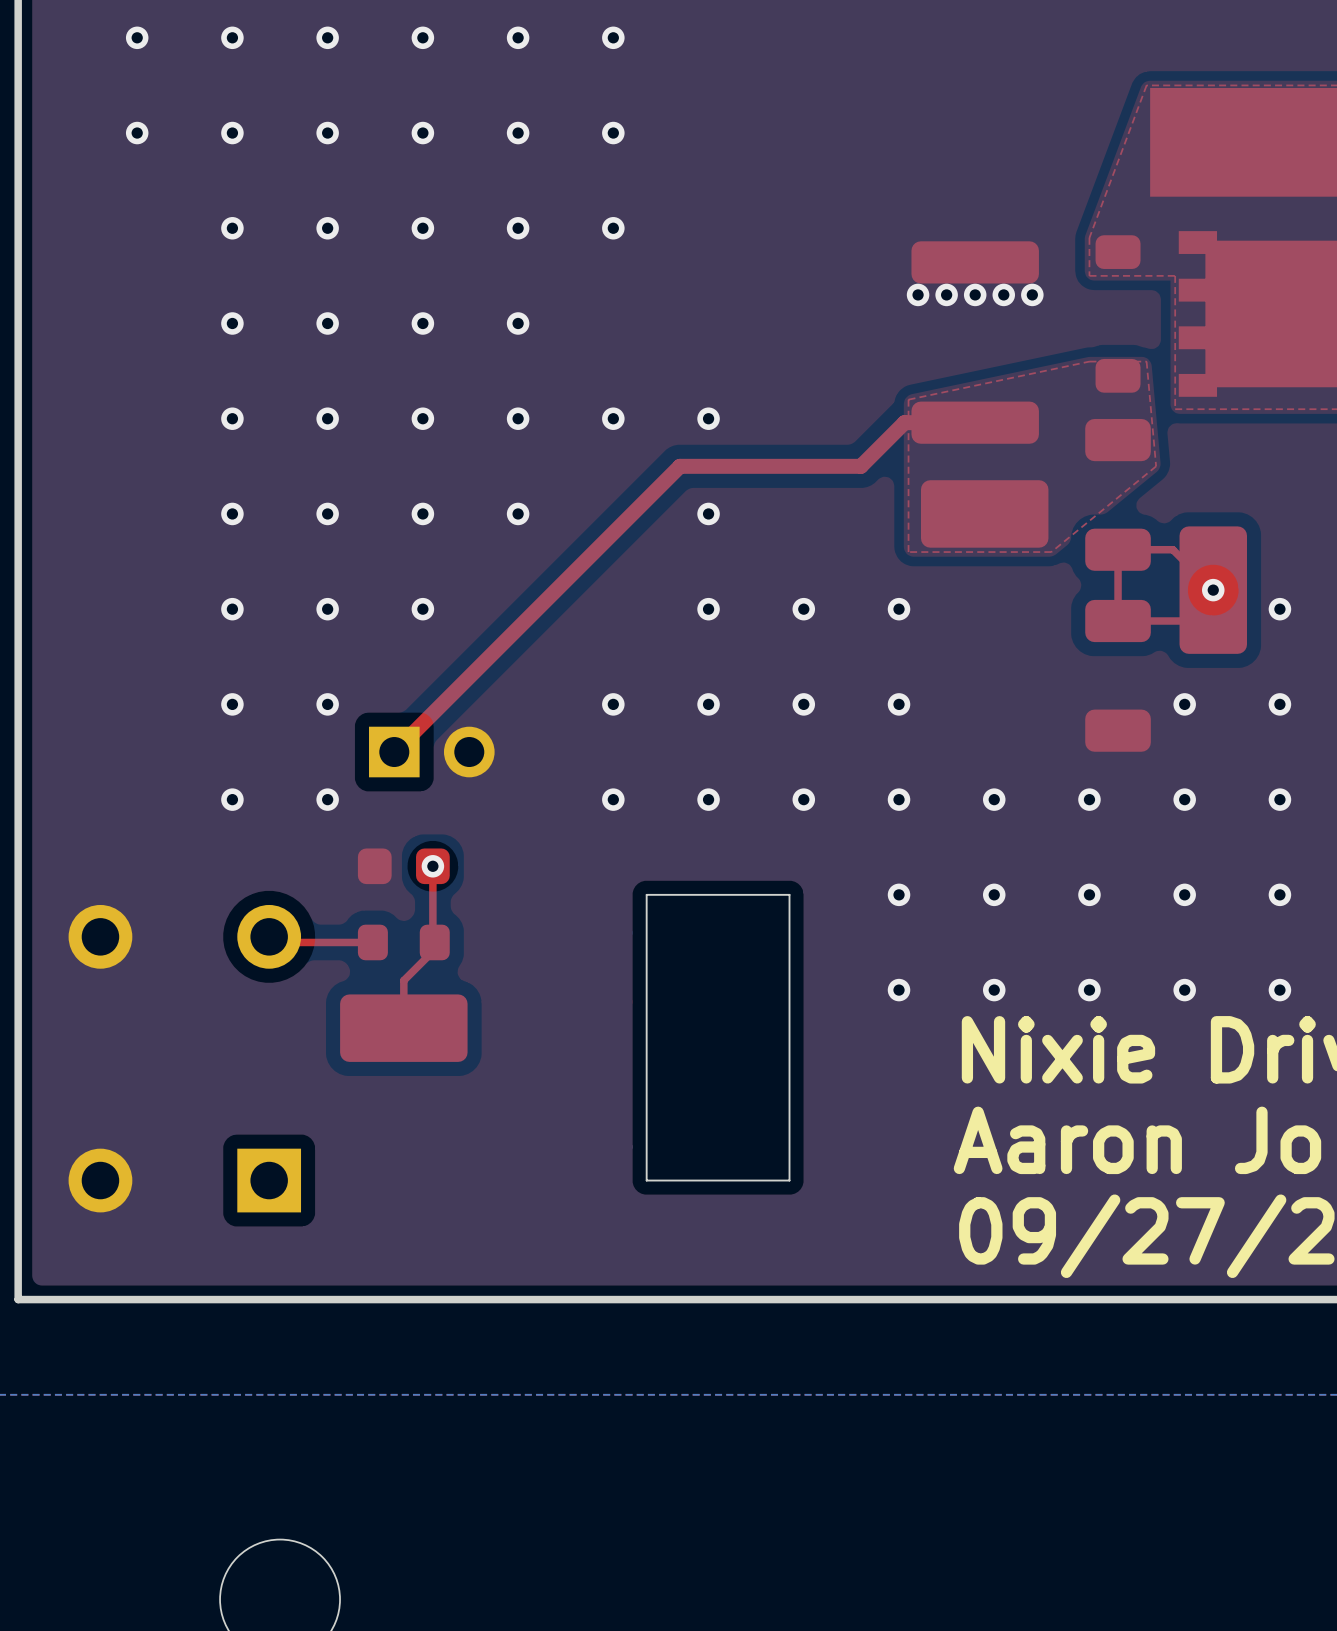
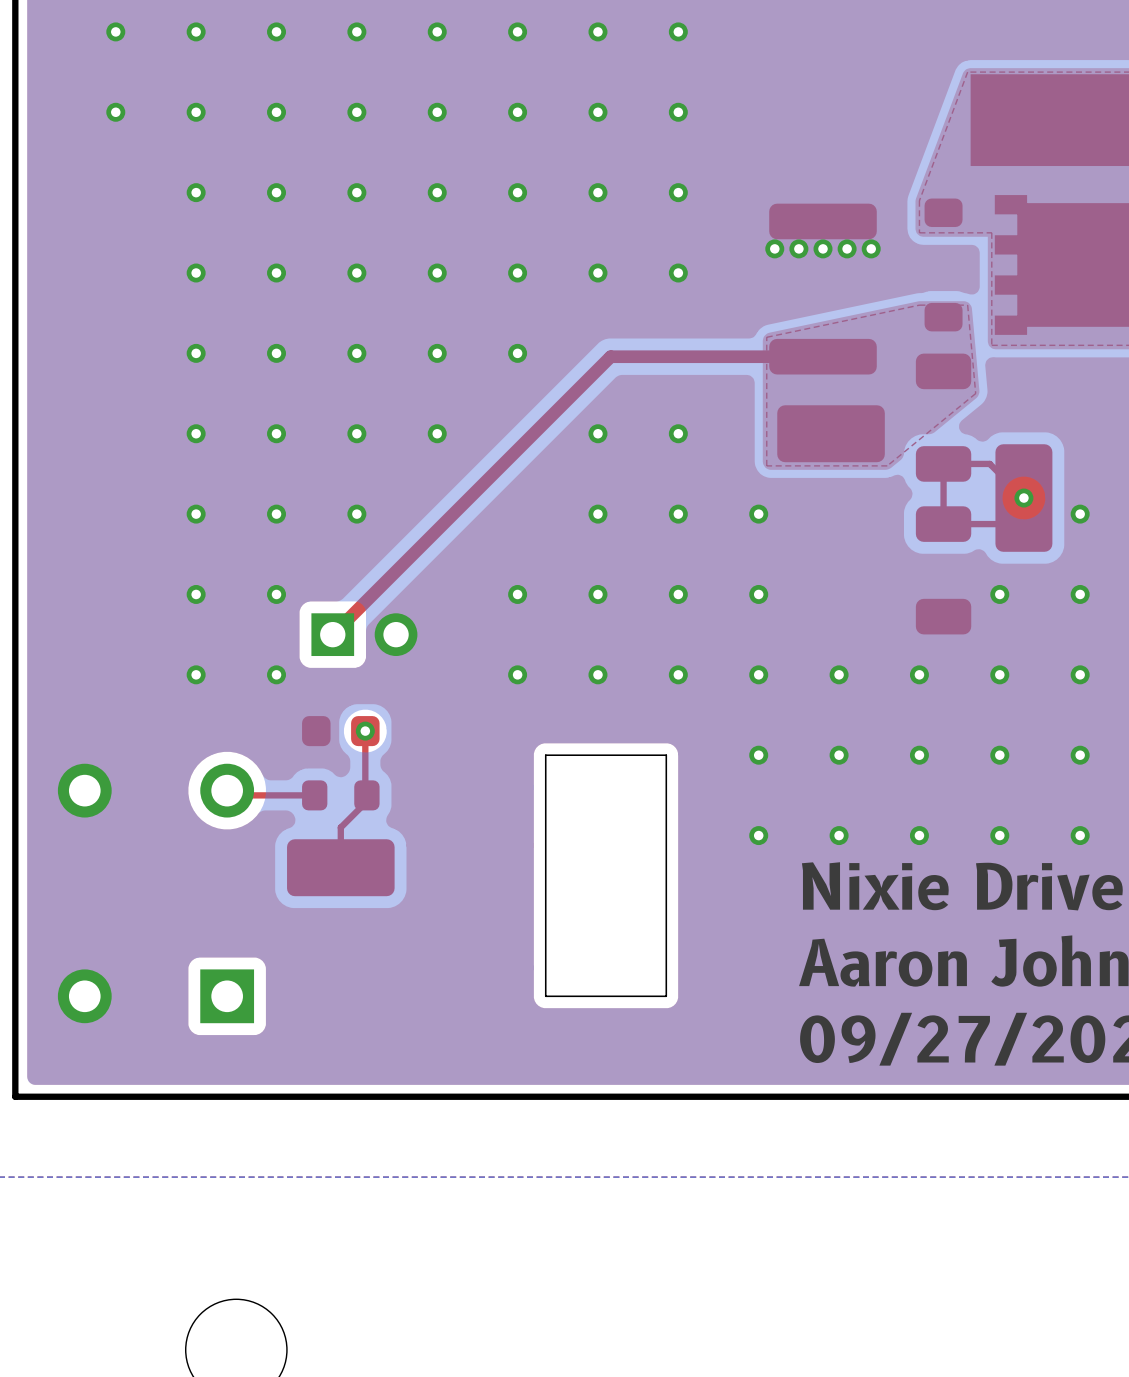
via: none -> (597, 31)
via: none -> (678, 31)
via: none -> (597, 112)
via: none -> (678, 112)
via: none -> (597, 192)
via: none -> (678, 192)
via: none -> (517, 273)
via: none -> (597, 273)
via: none -> (678, 273)
via: (708, 418) -> none
top track: (904, 422) (860, 466) (679, 466) -> (763, 356) (610, 356) (573, 393)
via: none -> (678, 433)

